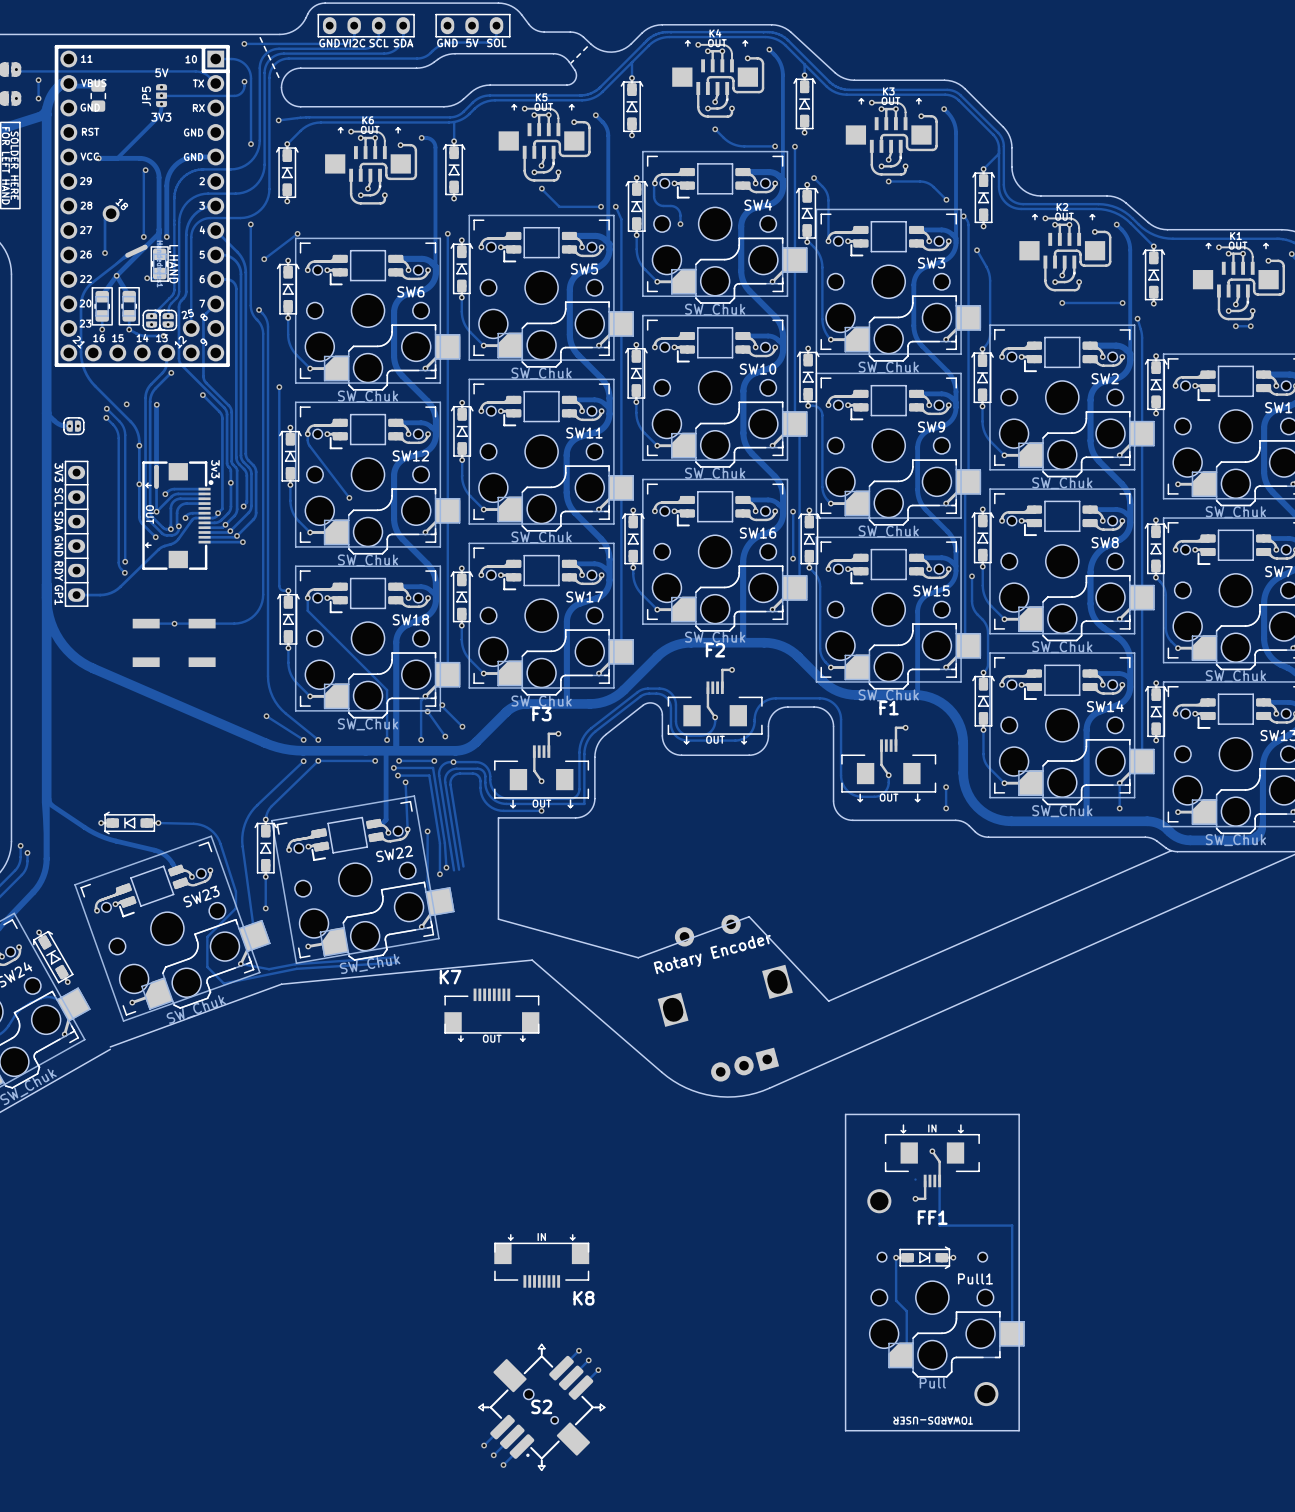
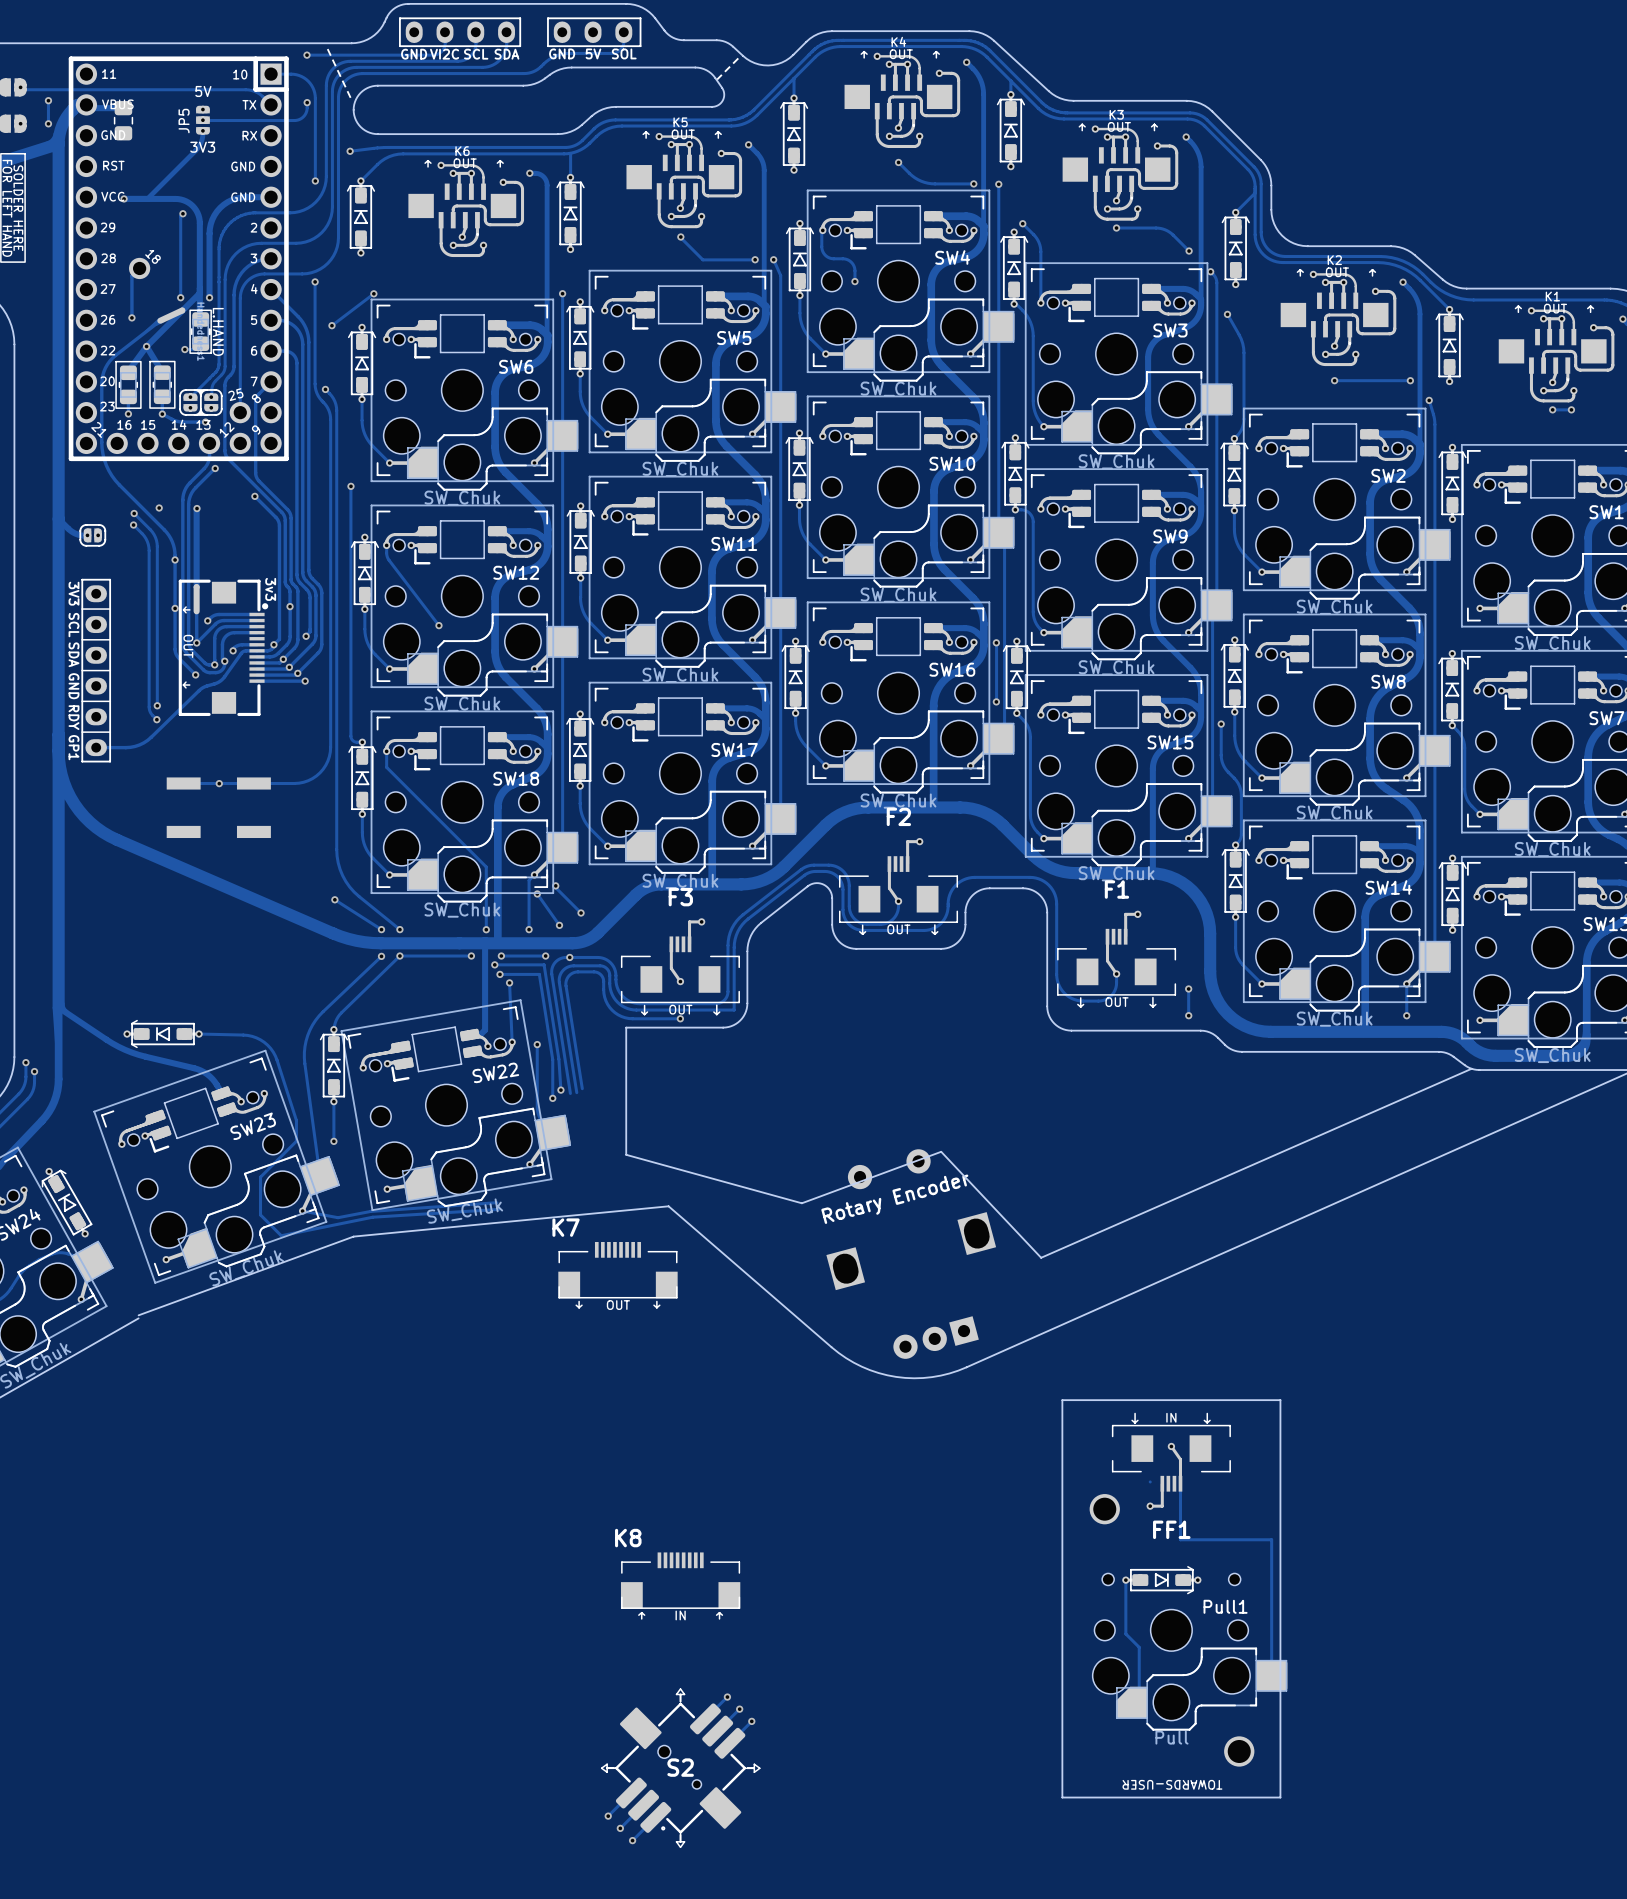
K8 rotation: 0° (541, 1261) -> 180° (680, 1585)

